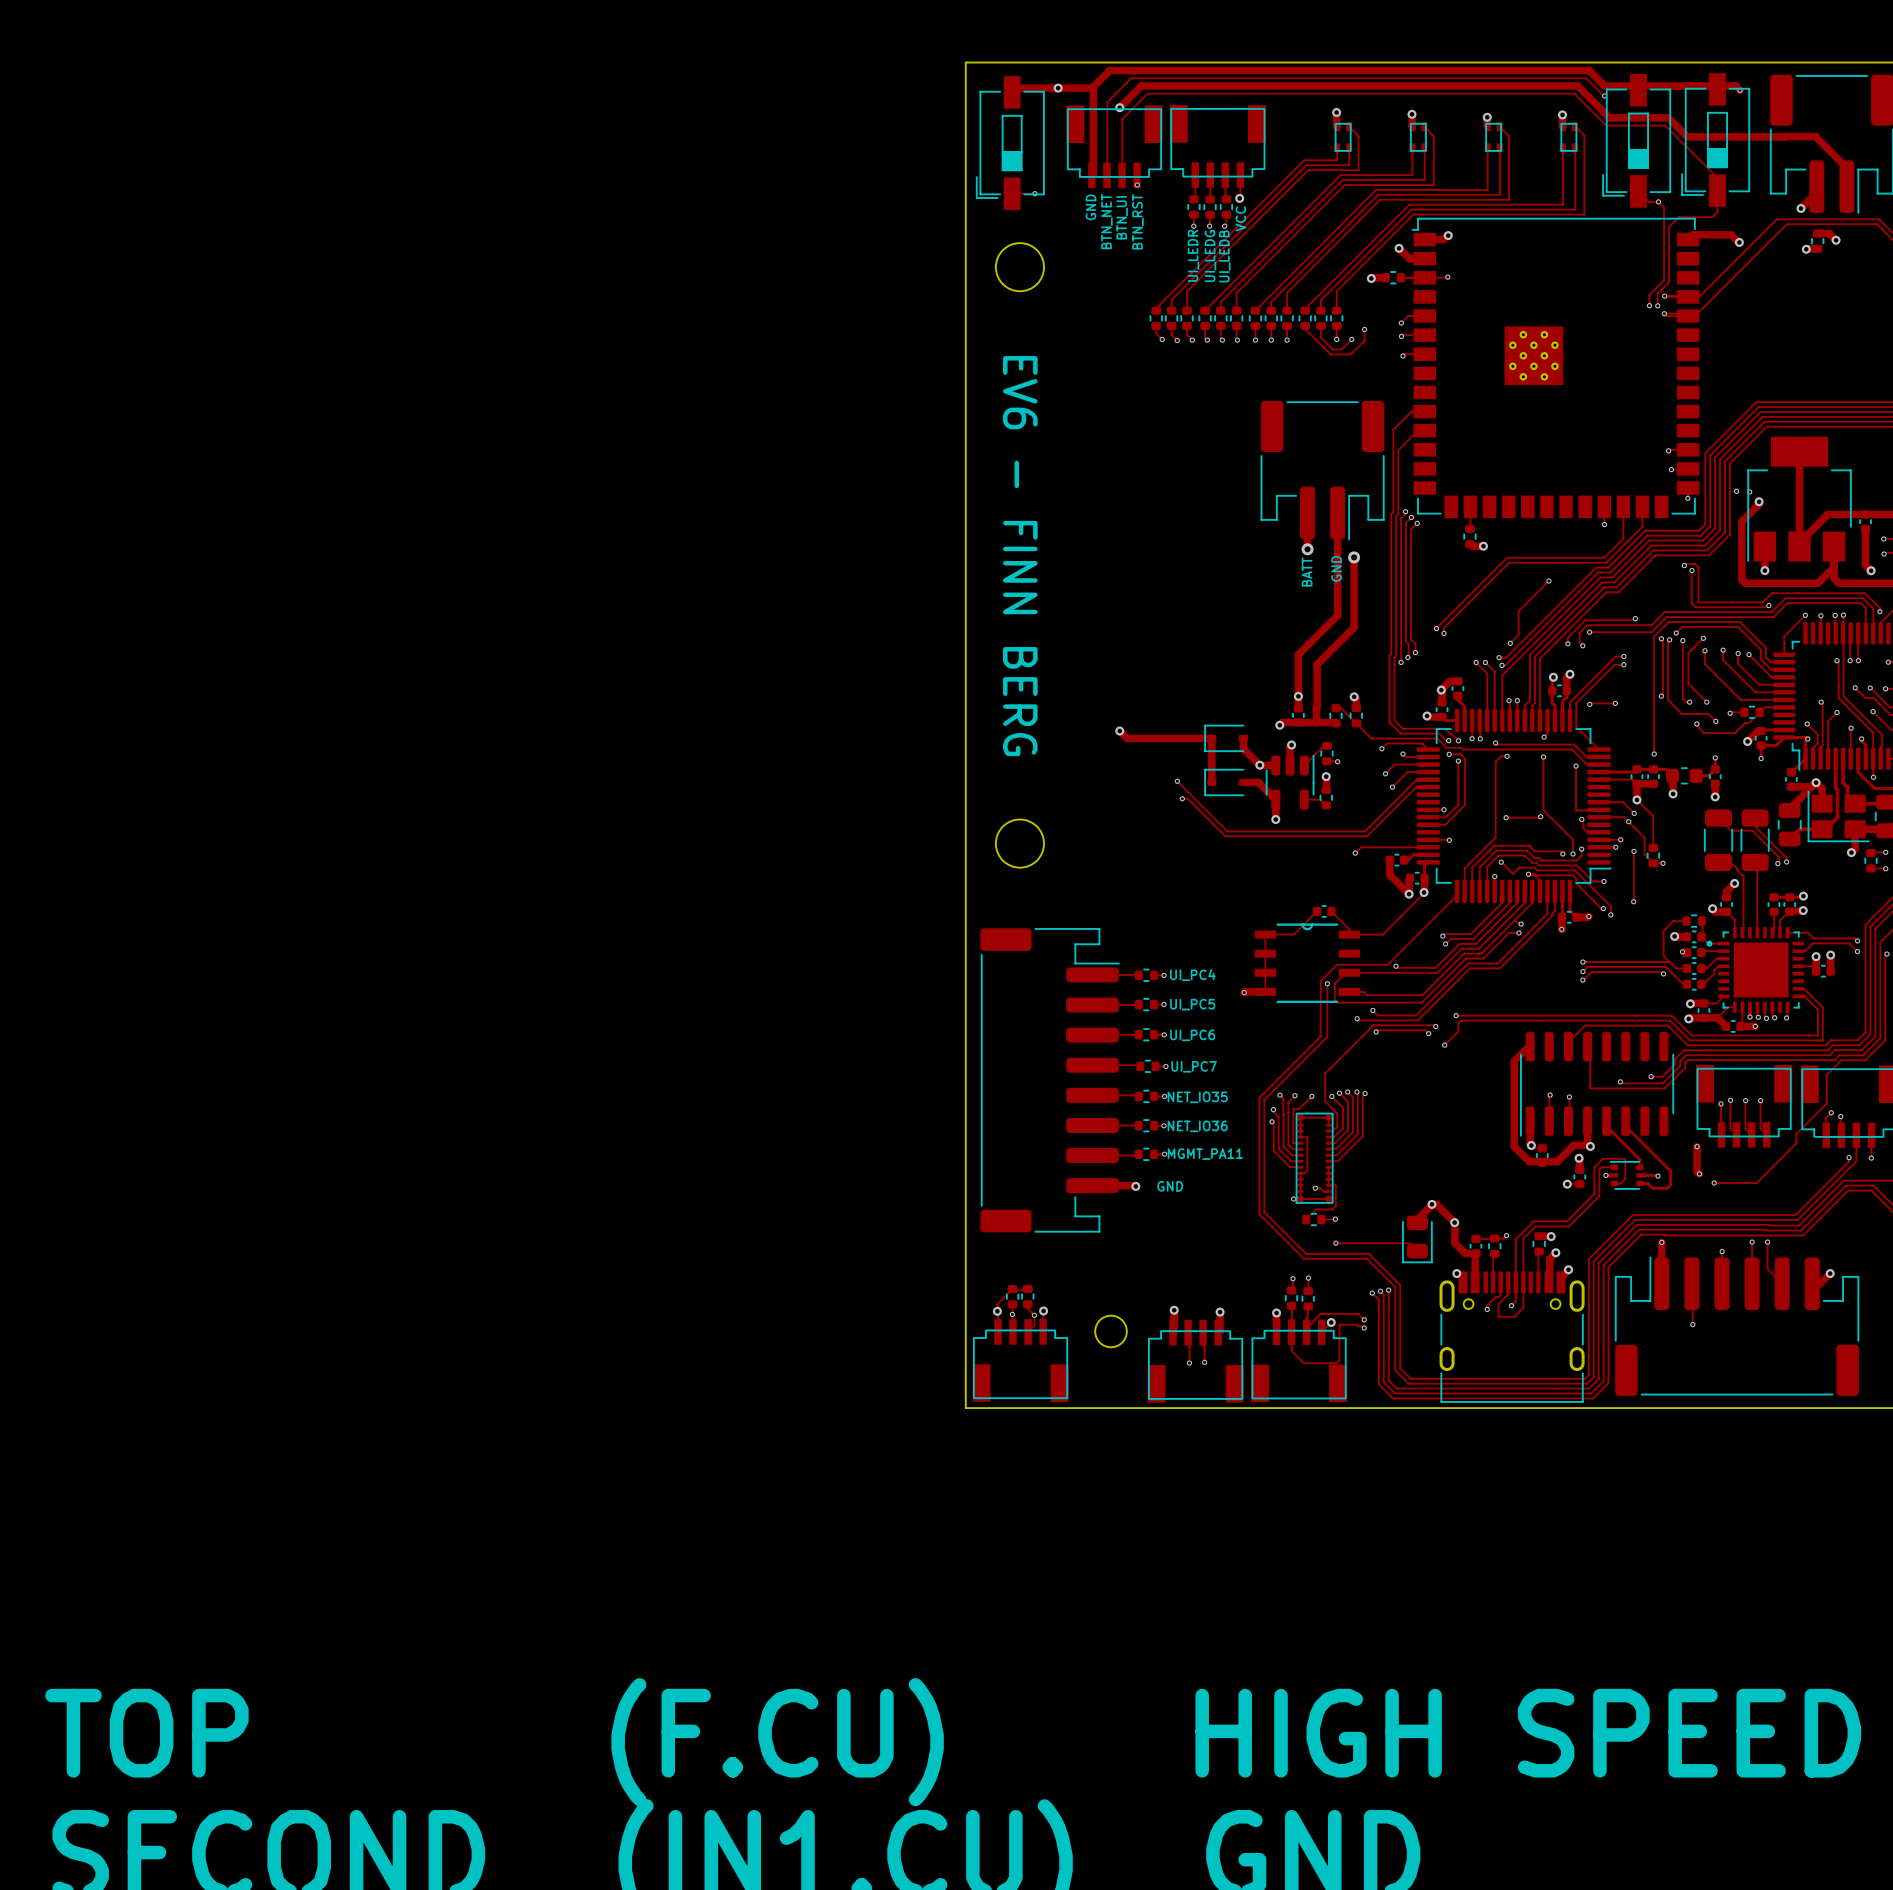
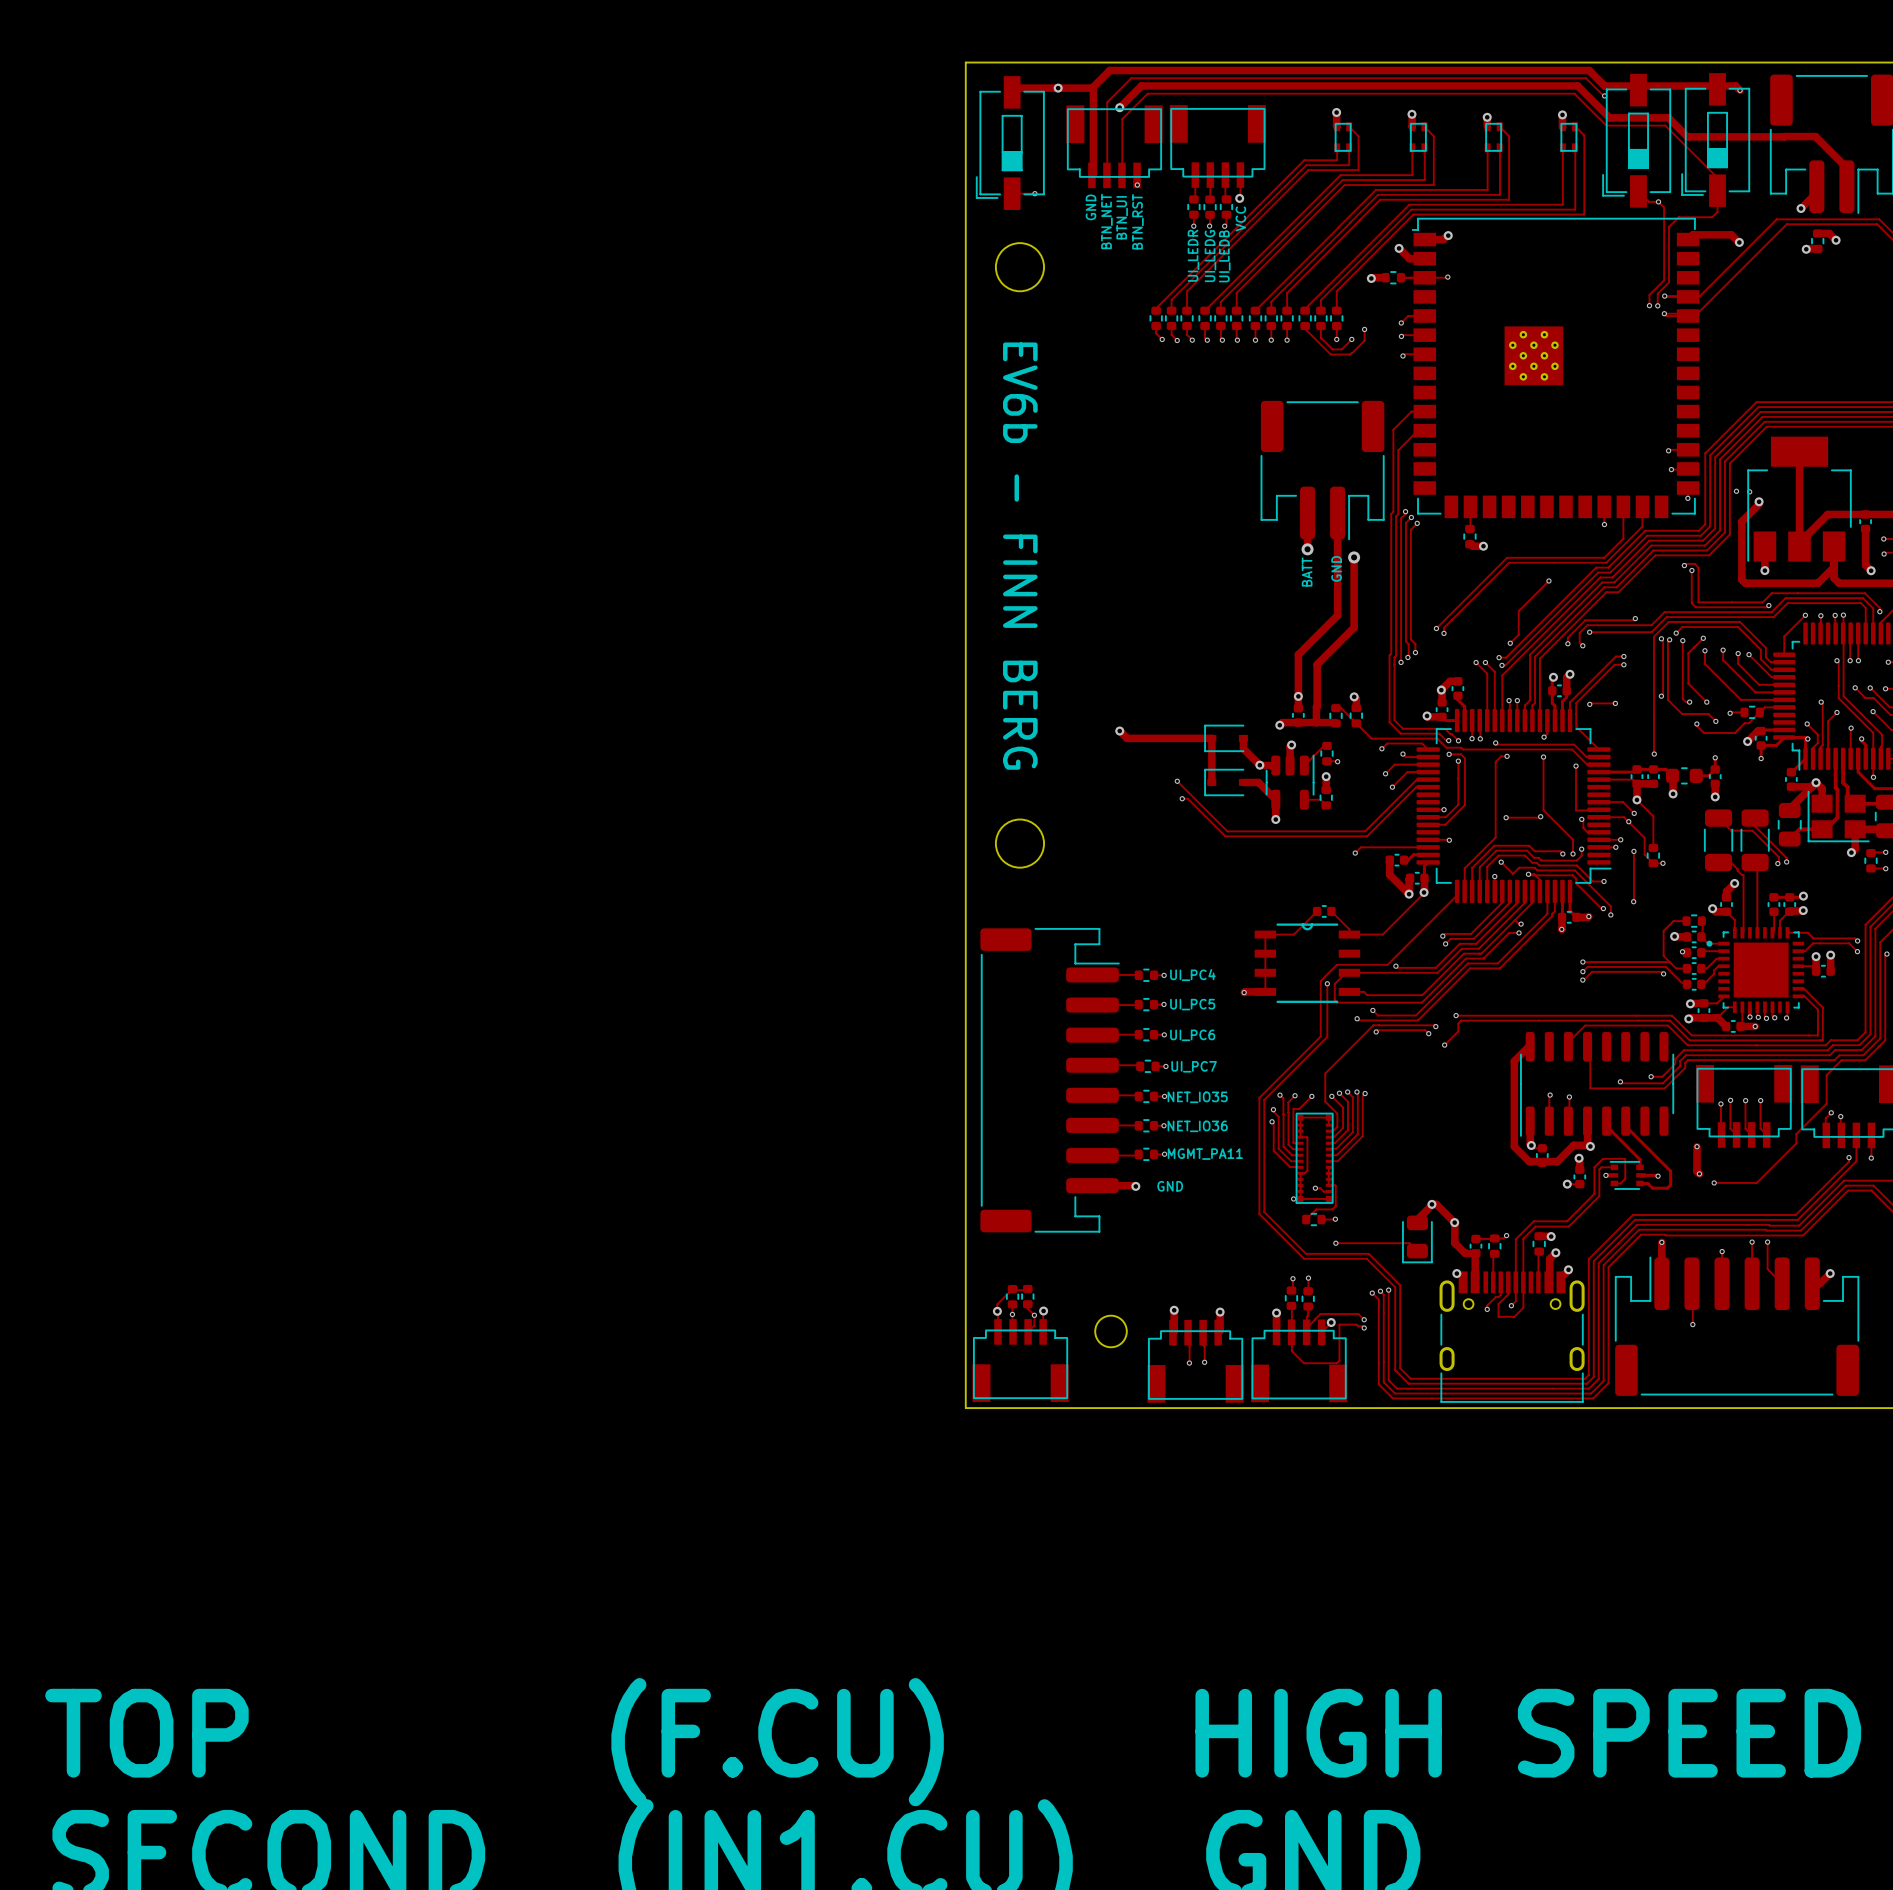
text: EV6 - FINN BERG (1020, 556) -> EV6b - FINN BERG (1020, 556)

